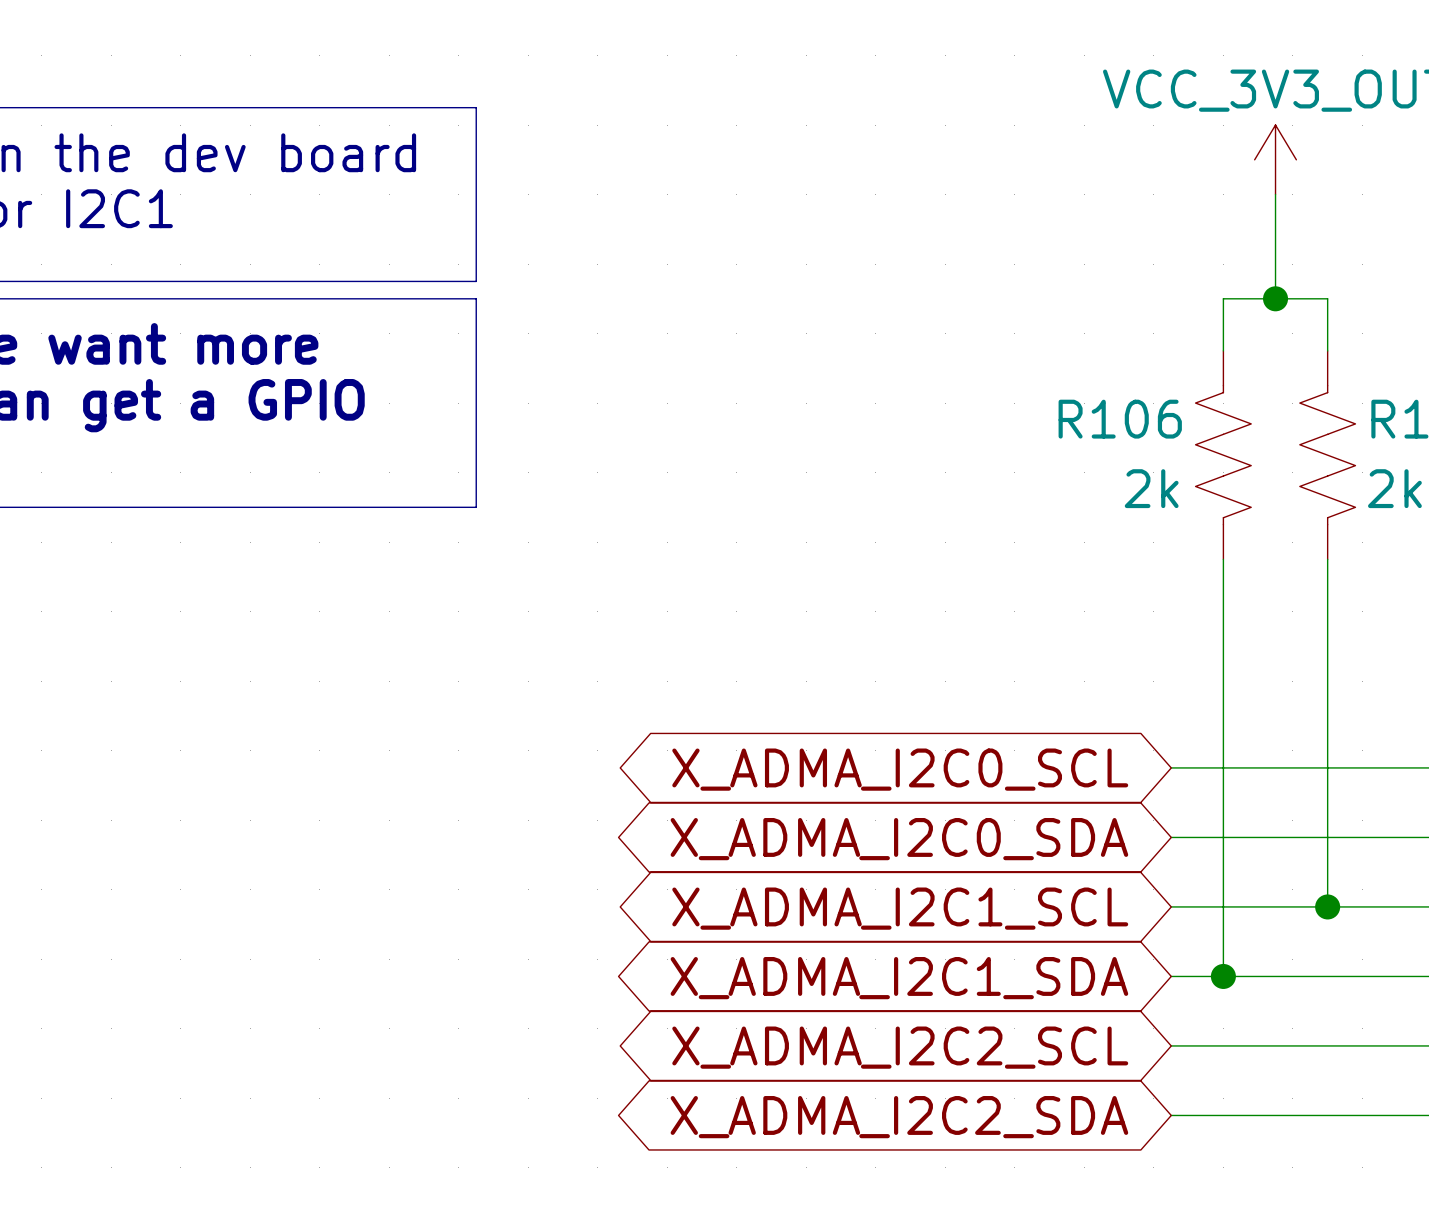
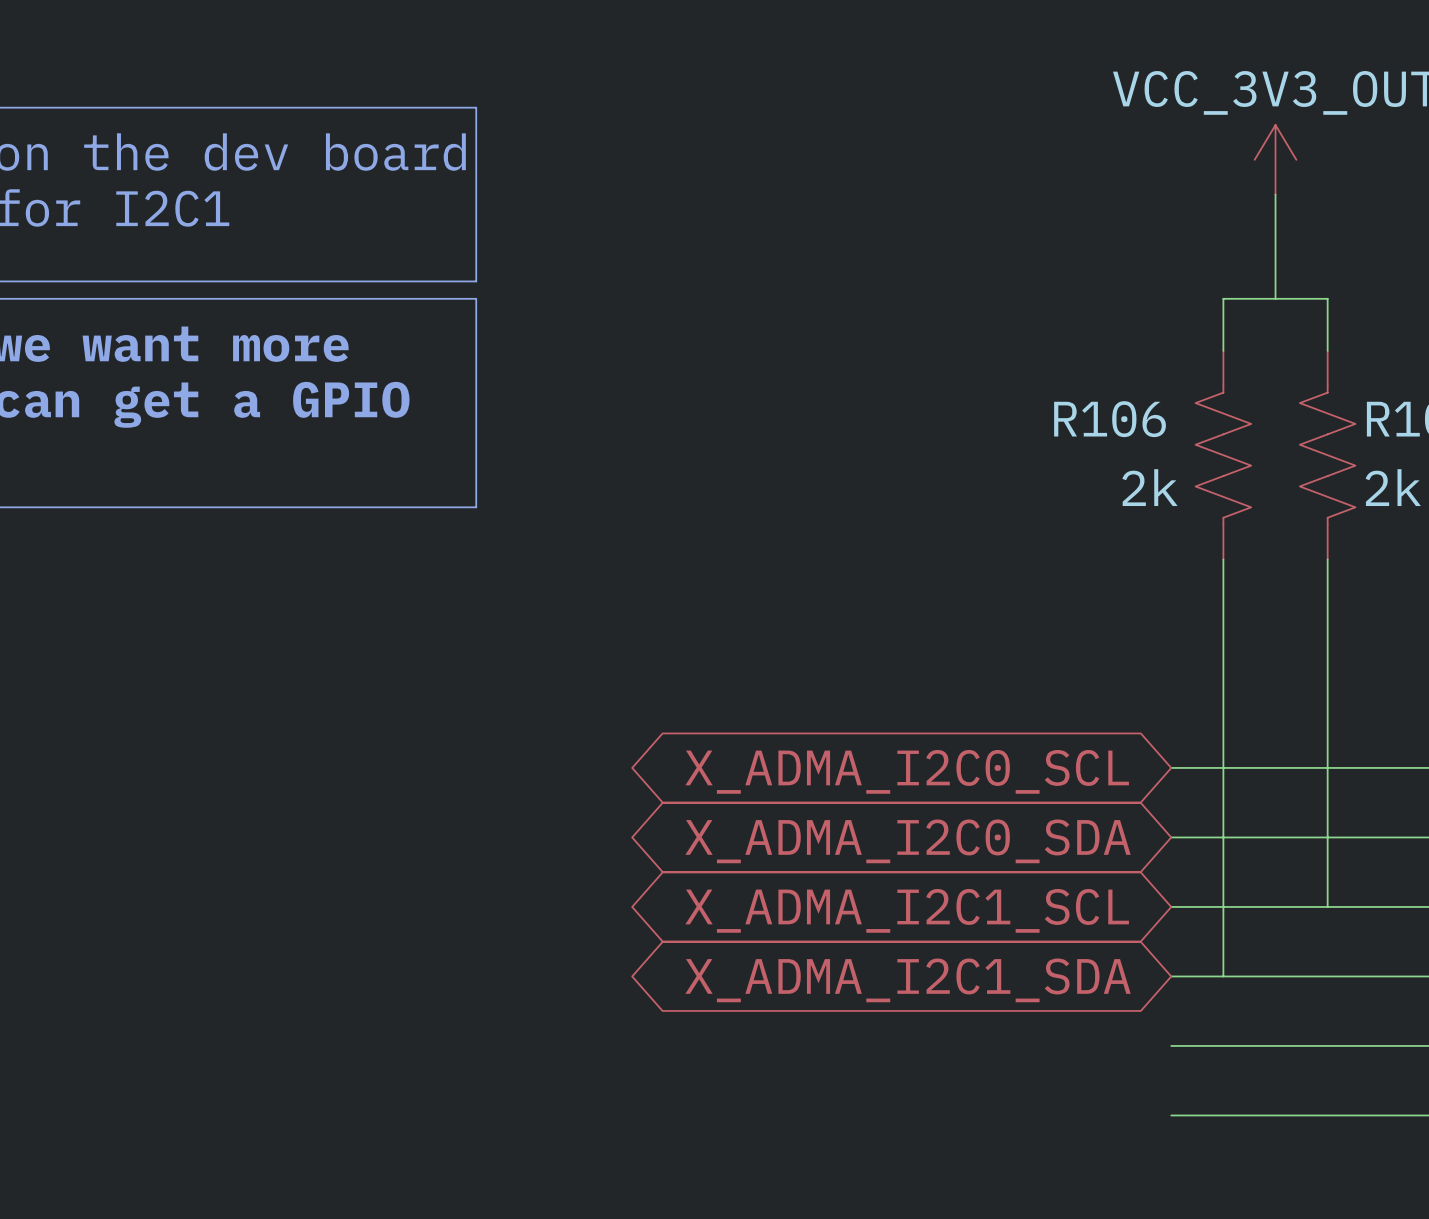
junction: (1275, 298) -> none
junction: (1327, 906) -> none
junction: (1223, 976) -> none
global label: X_ADMA_I2C2_SCL (900, 1047) -> none
global label: X_ADMA_I2C2_SDA (899, 1117) -> none

